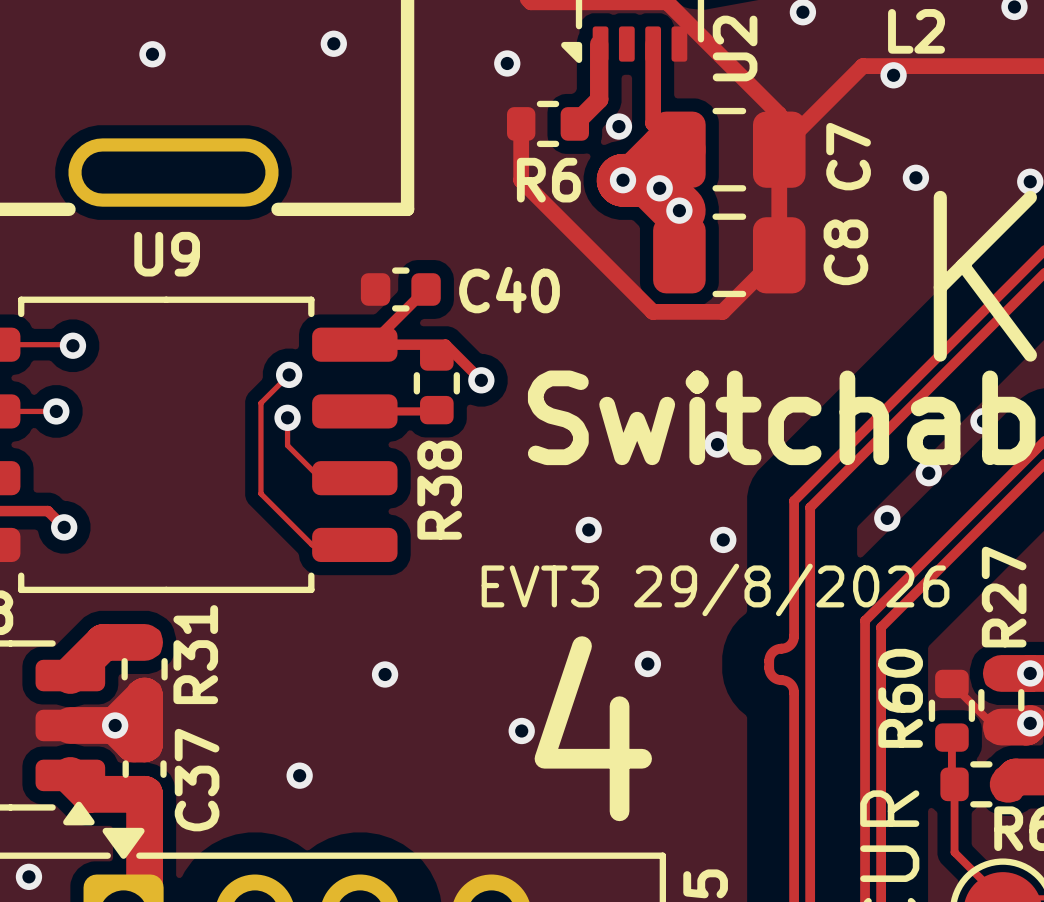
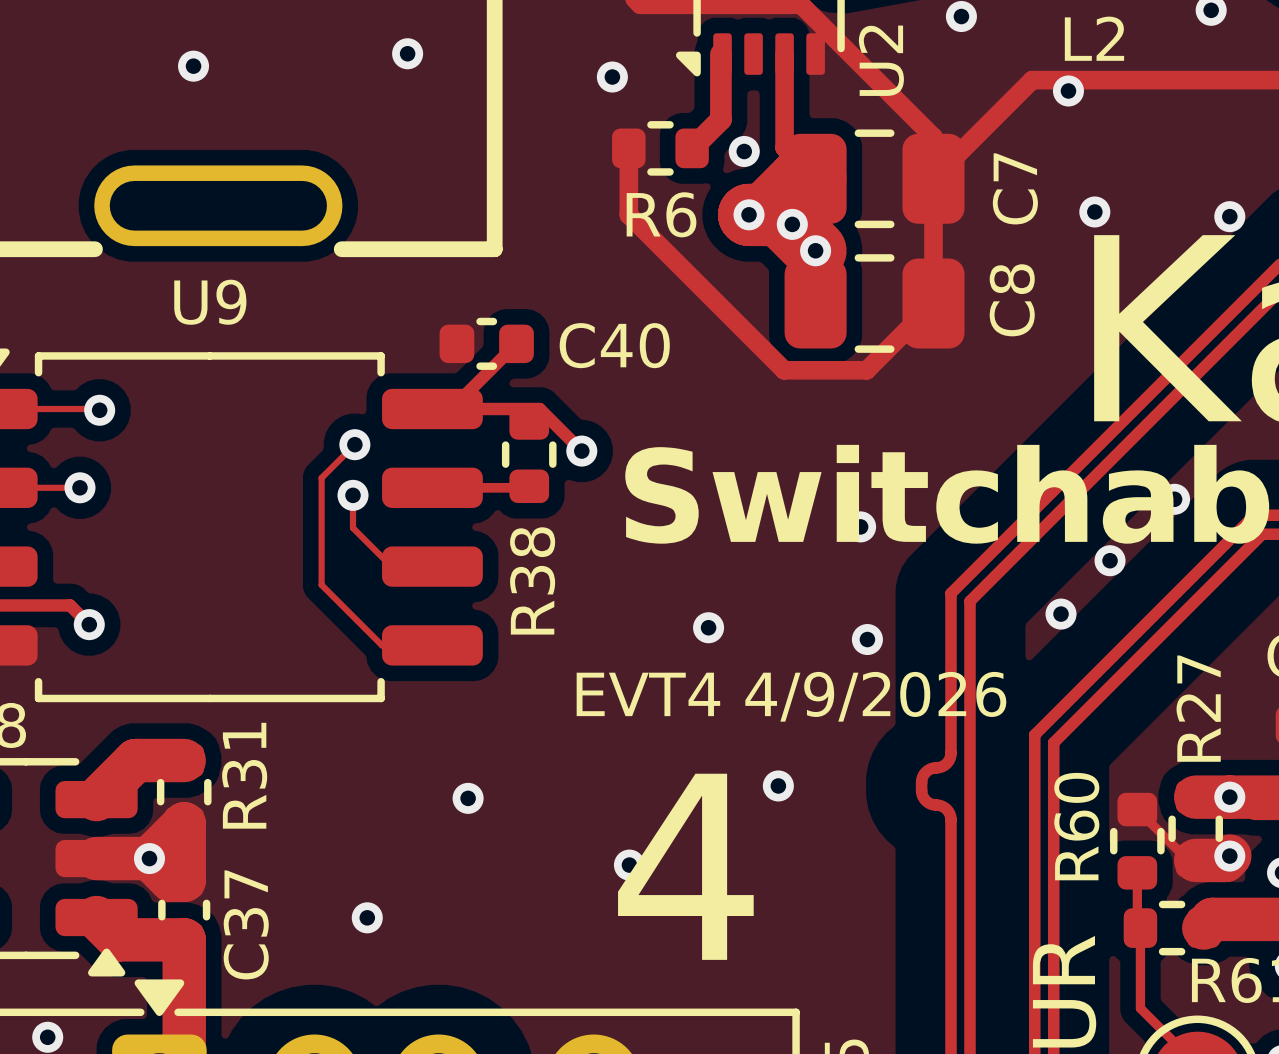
text: EVT3 29/8/2026 (715, 589) -> EVT4 4/9/2026 (791, 696)

